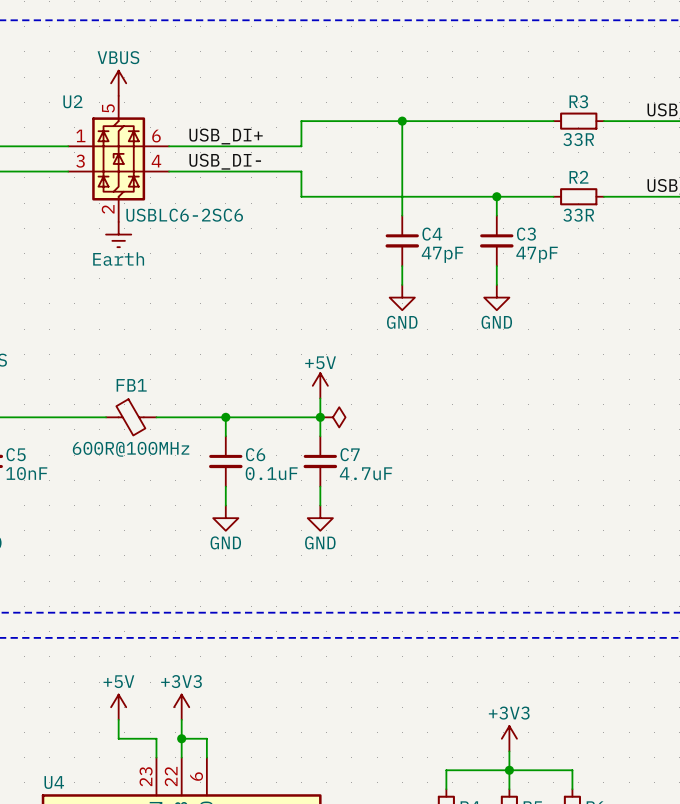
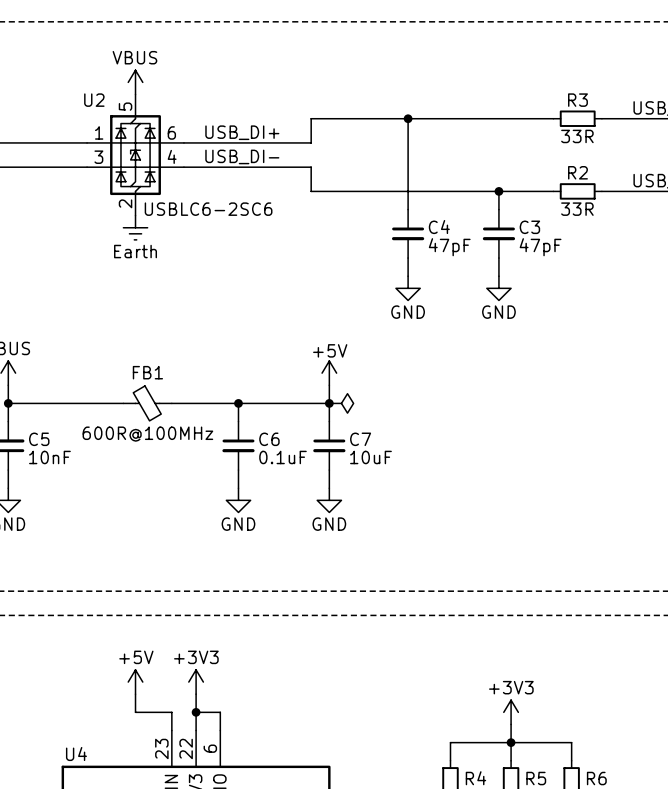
C7 value: 4.7uF (366, 473) -> 10uF (370, 457)

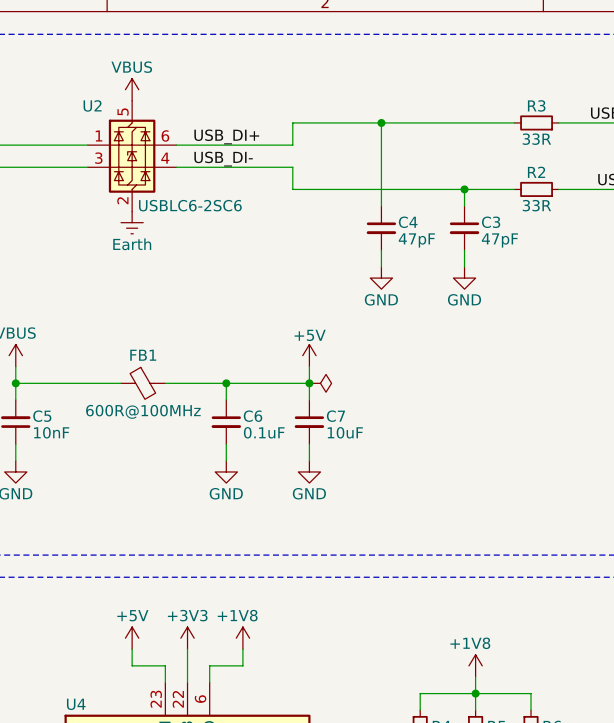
power symbol: none -> +1V8 (242, 638)
wire: (196, 712) (220, 712) -> (242, 649) (242, 665) (209, 665)
junction: (196, 712) -> none
power symbol: +3V3 (511, 712) -> +1V8 (475, 665)

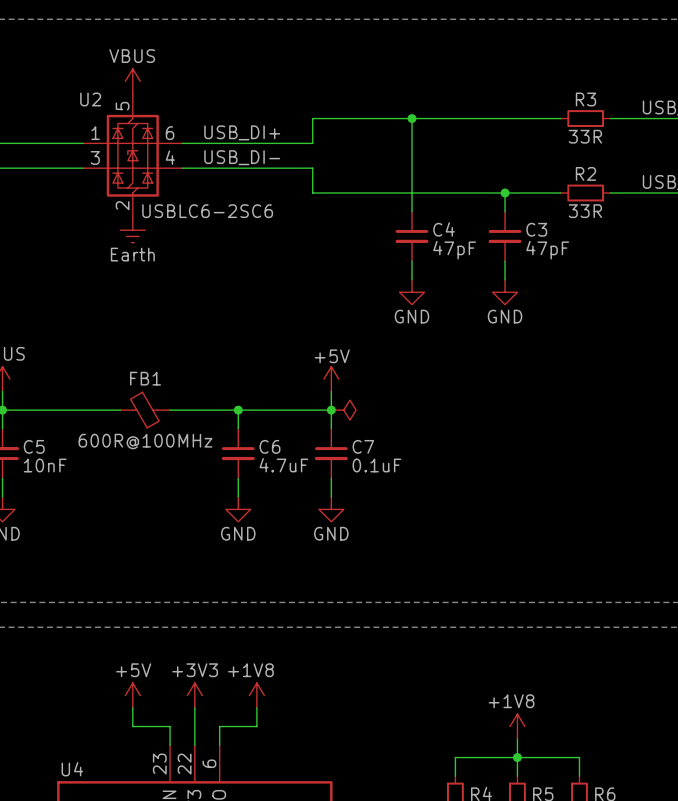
C6 value: 0.1uF (264, 432) -> 4.7uF (283, 465)
C7 value: 10uF (345, 432) -> 0.1uF (376, 465)

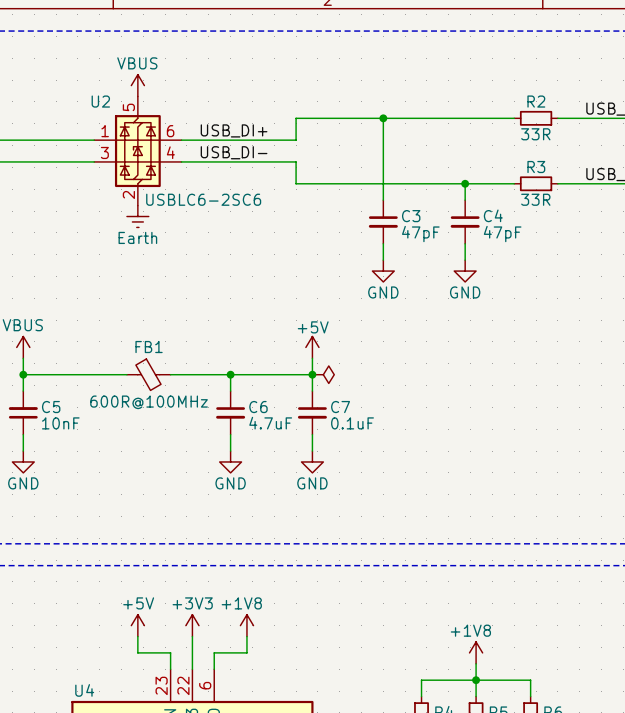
R3 name: R3 (585, 99) -> R2 (536, 101)
R2 name: R2 (585, 173) -> R3 (536, 167)
C4 name: C4 (443, 229) -> C3 (411, 216)
C3 name: C3 (536, 229) -> C4 (493, 215)

